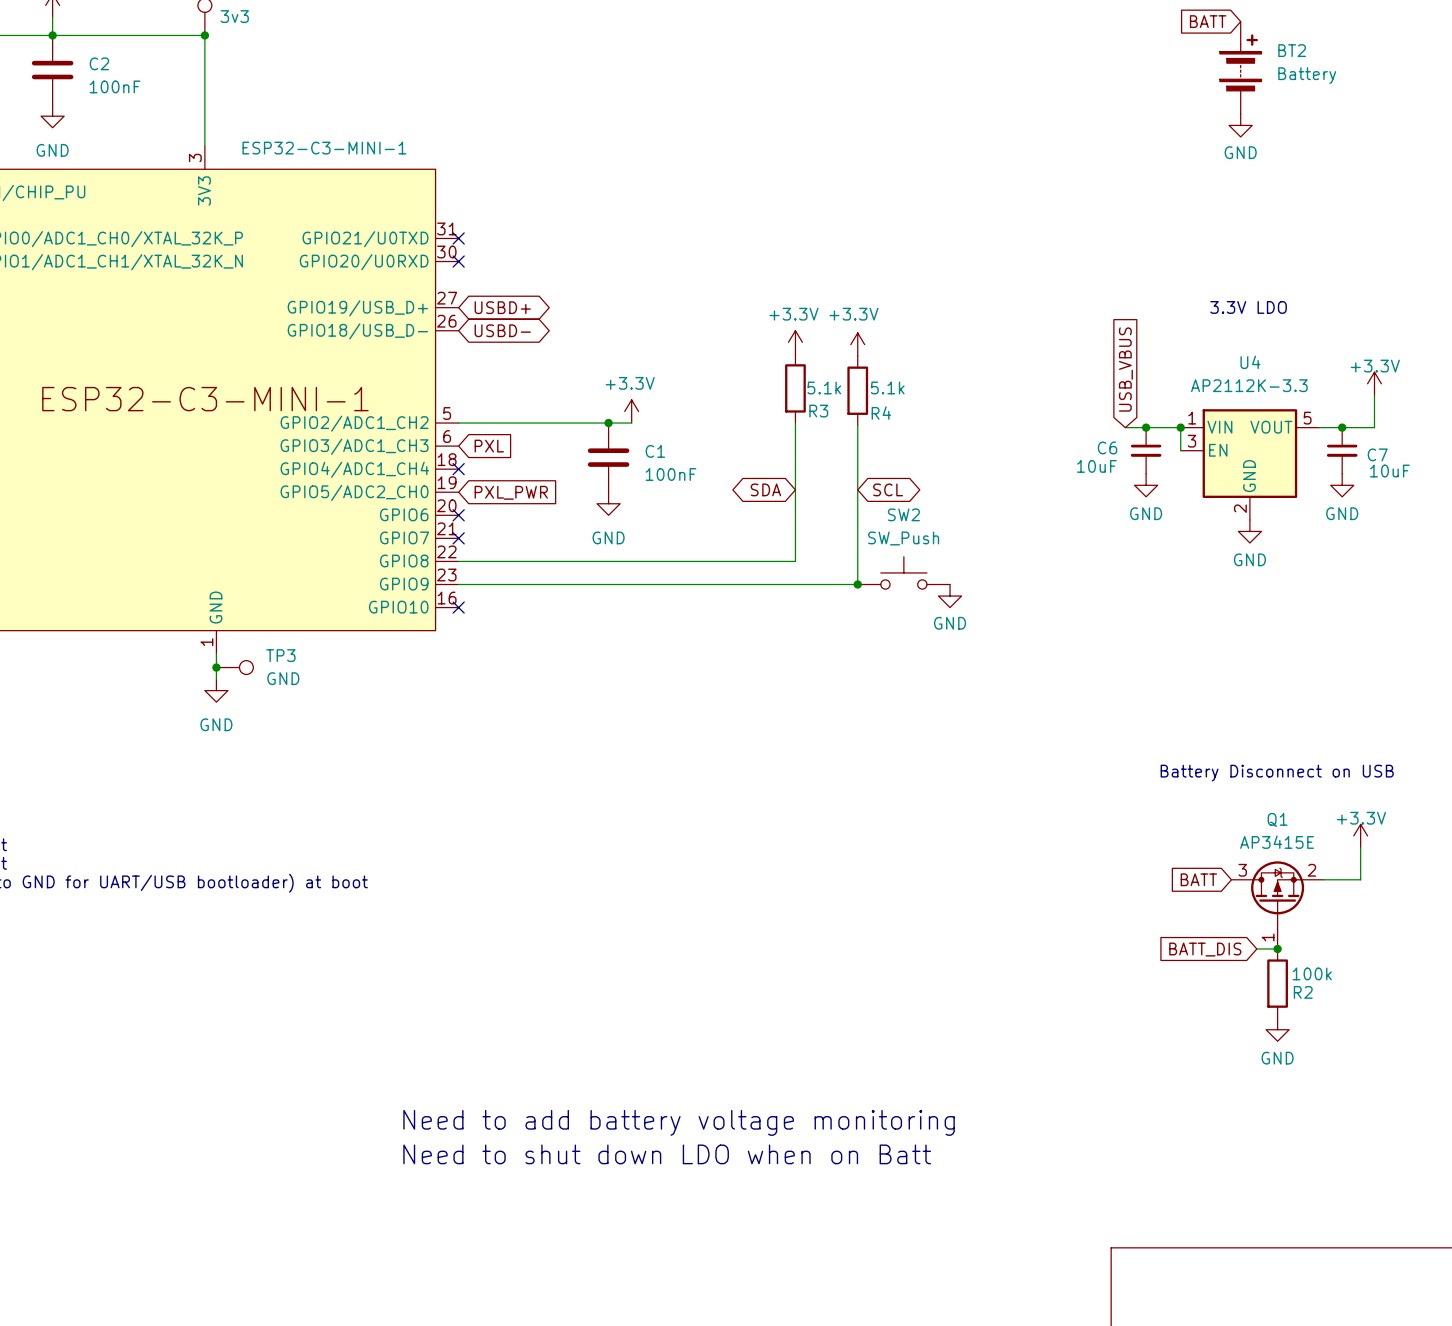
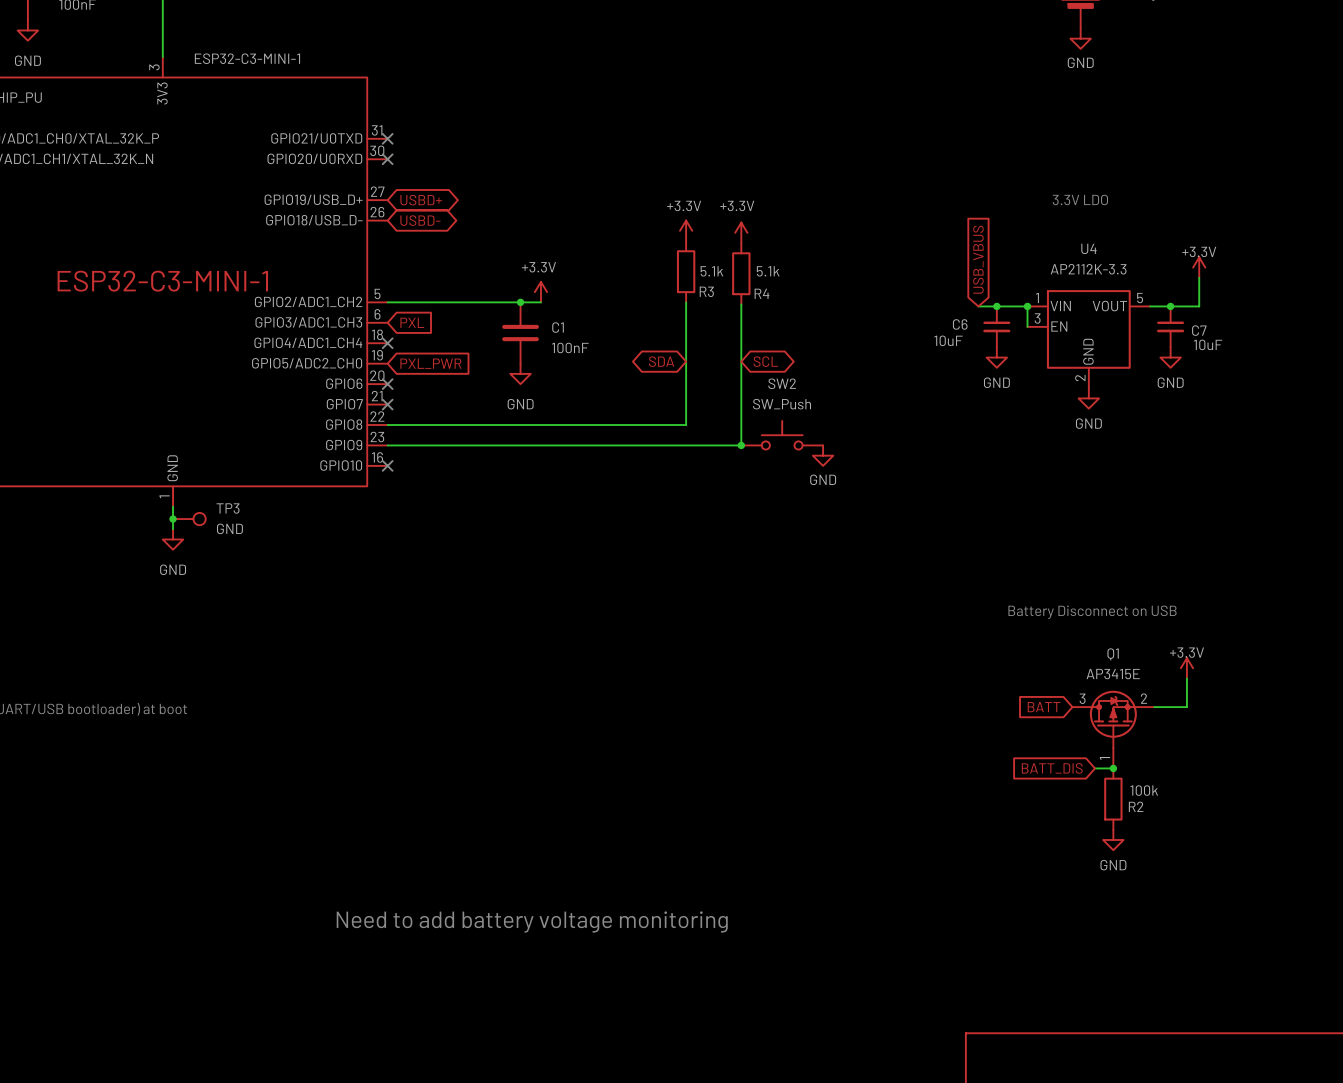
text: Need to shut down LDO when on Batt (667, 1154) -> none

